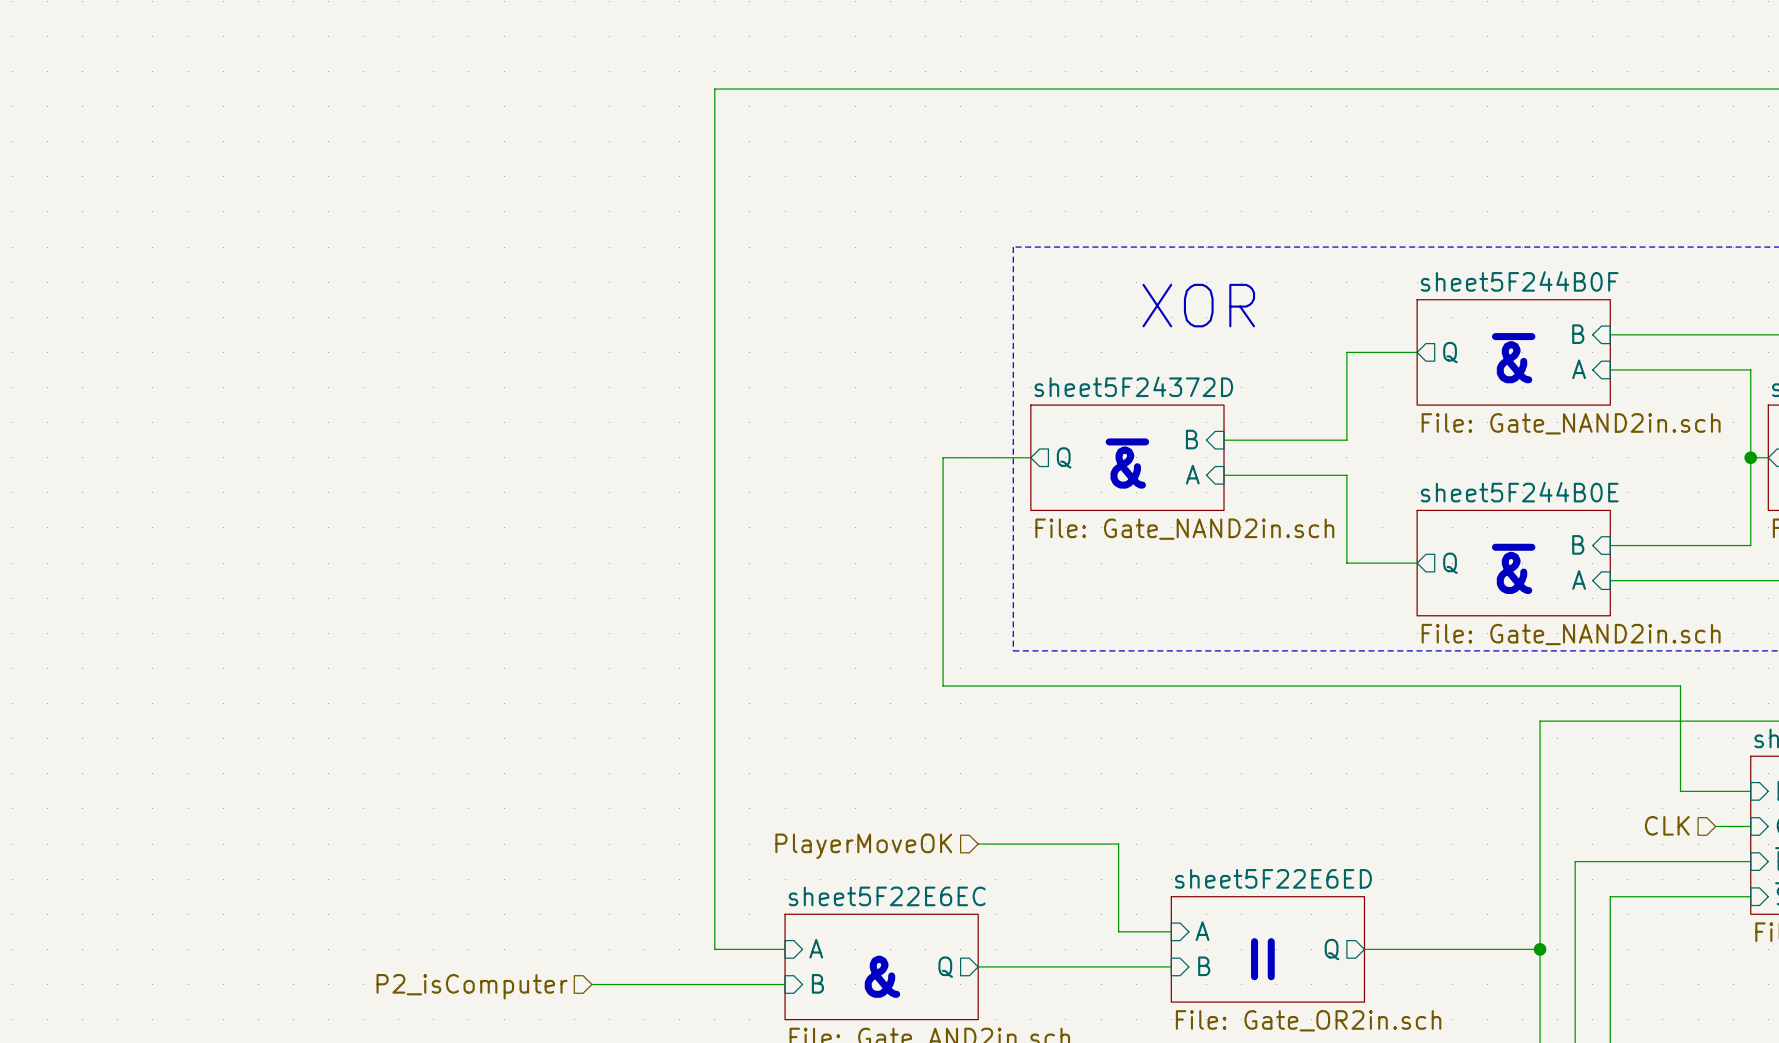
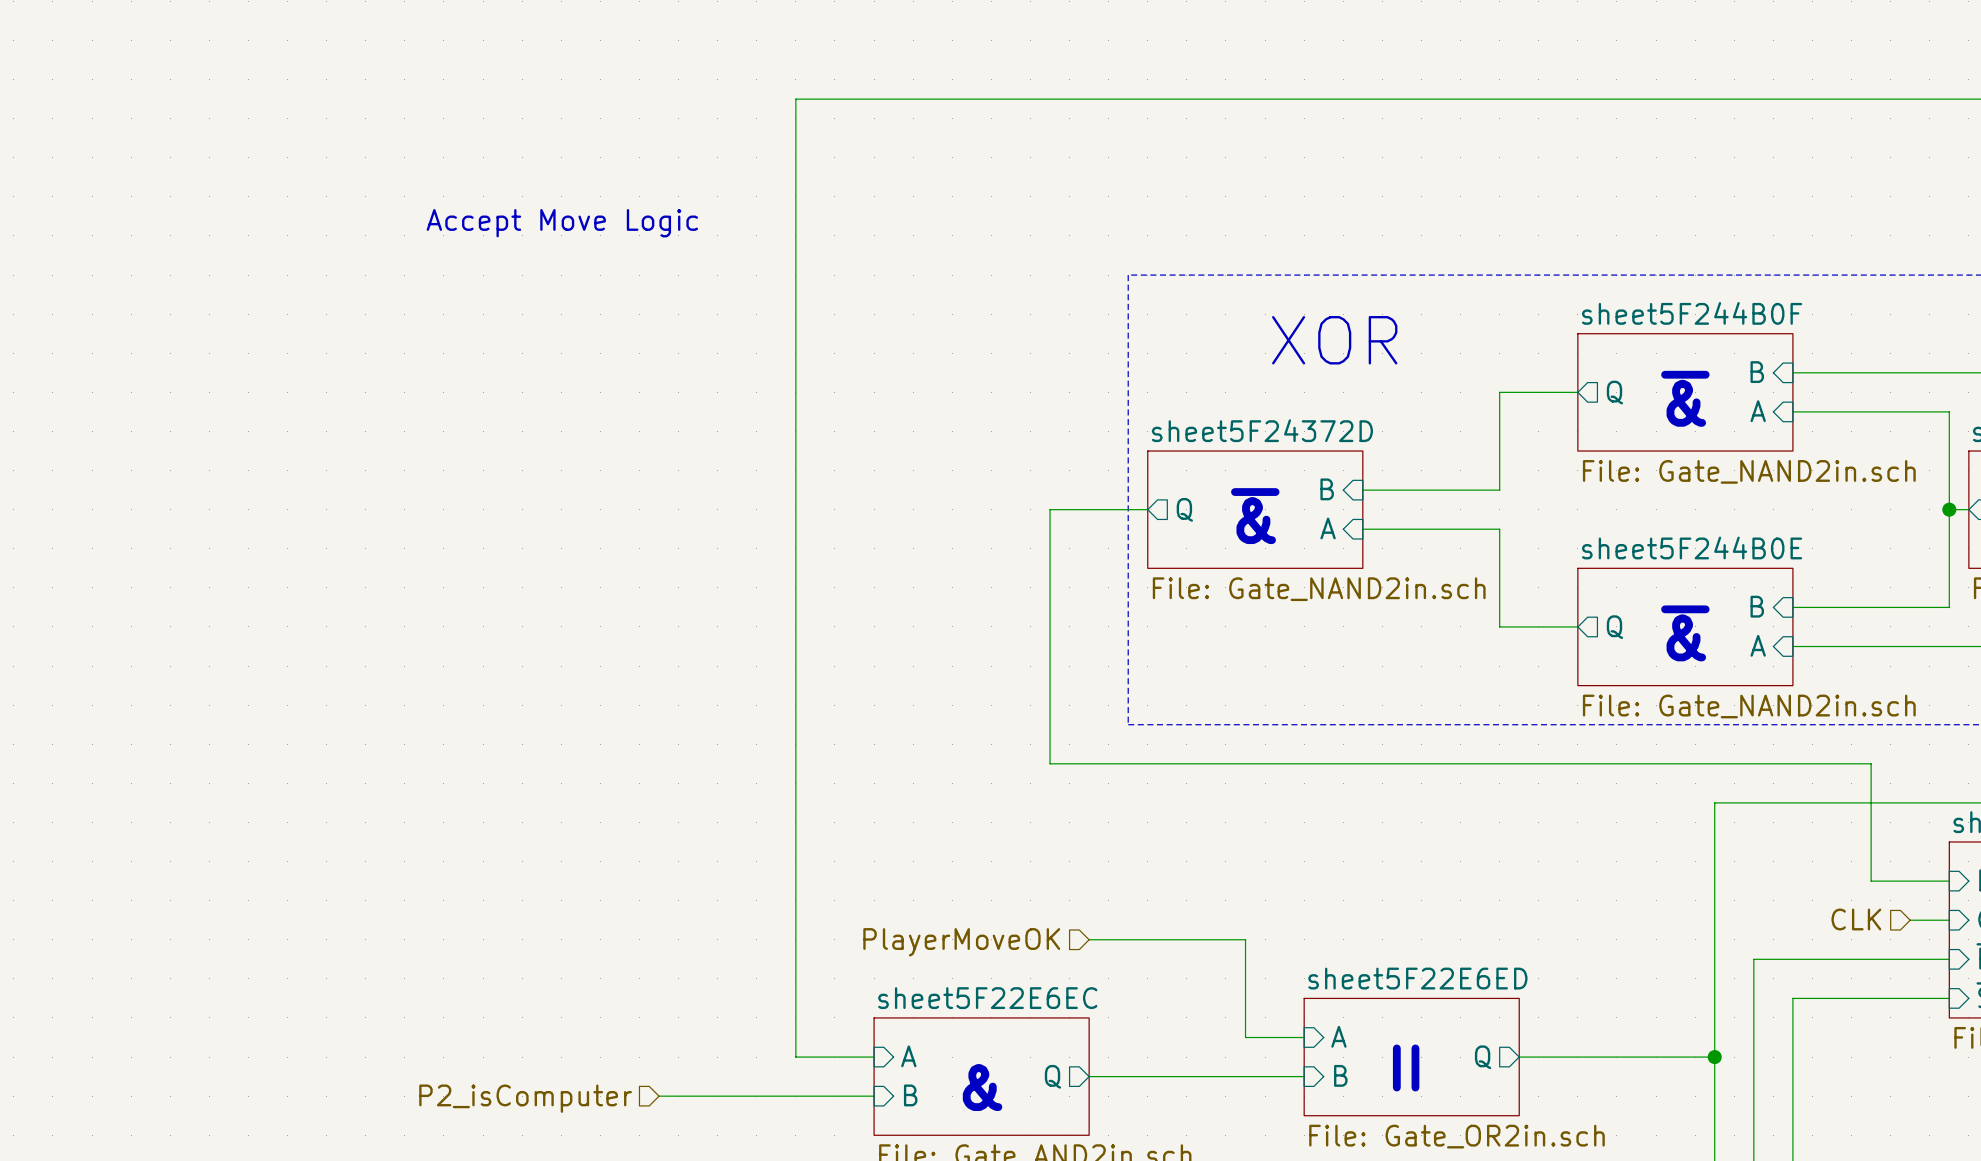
text: none -> Accept Move Logic (562, 223)

